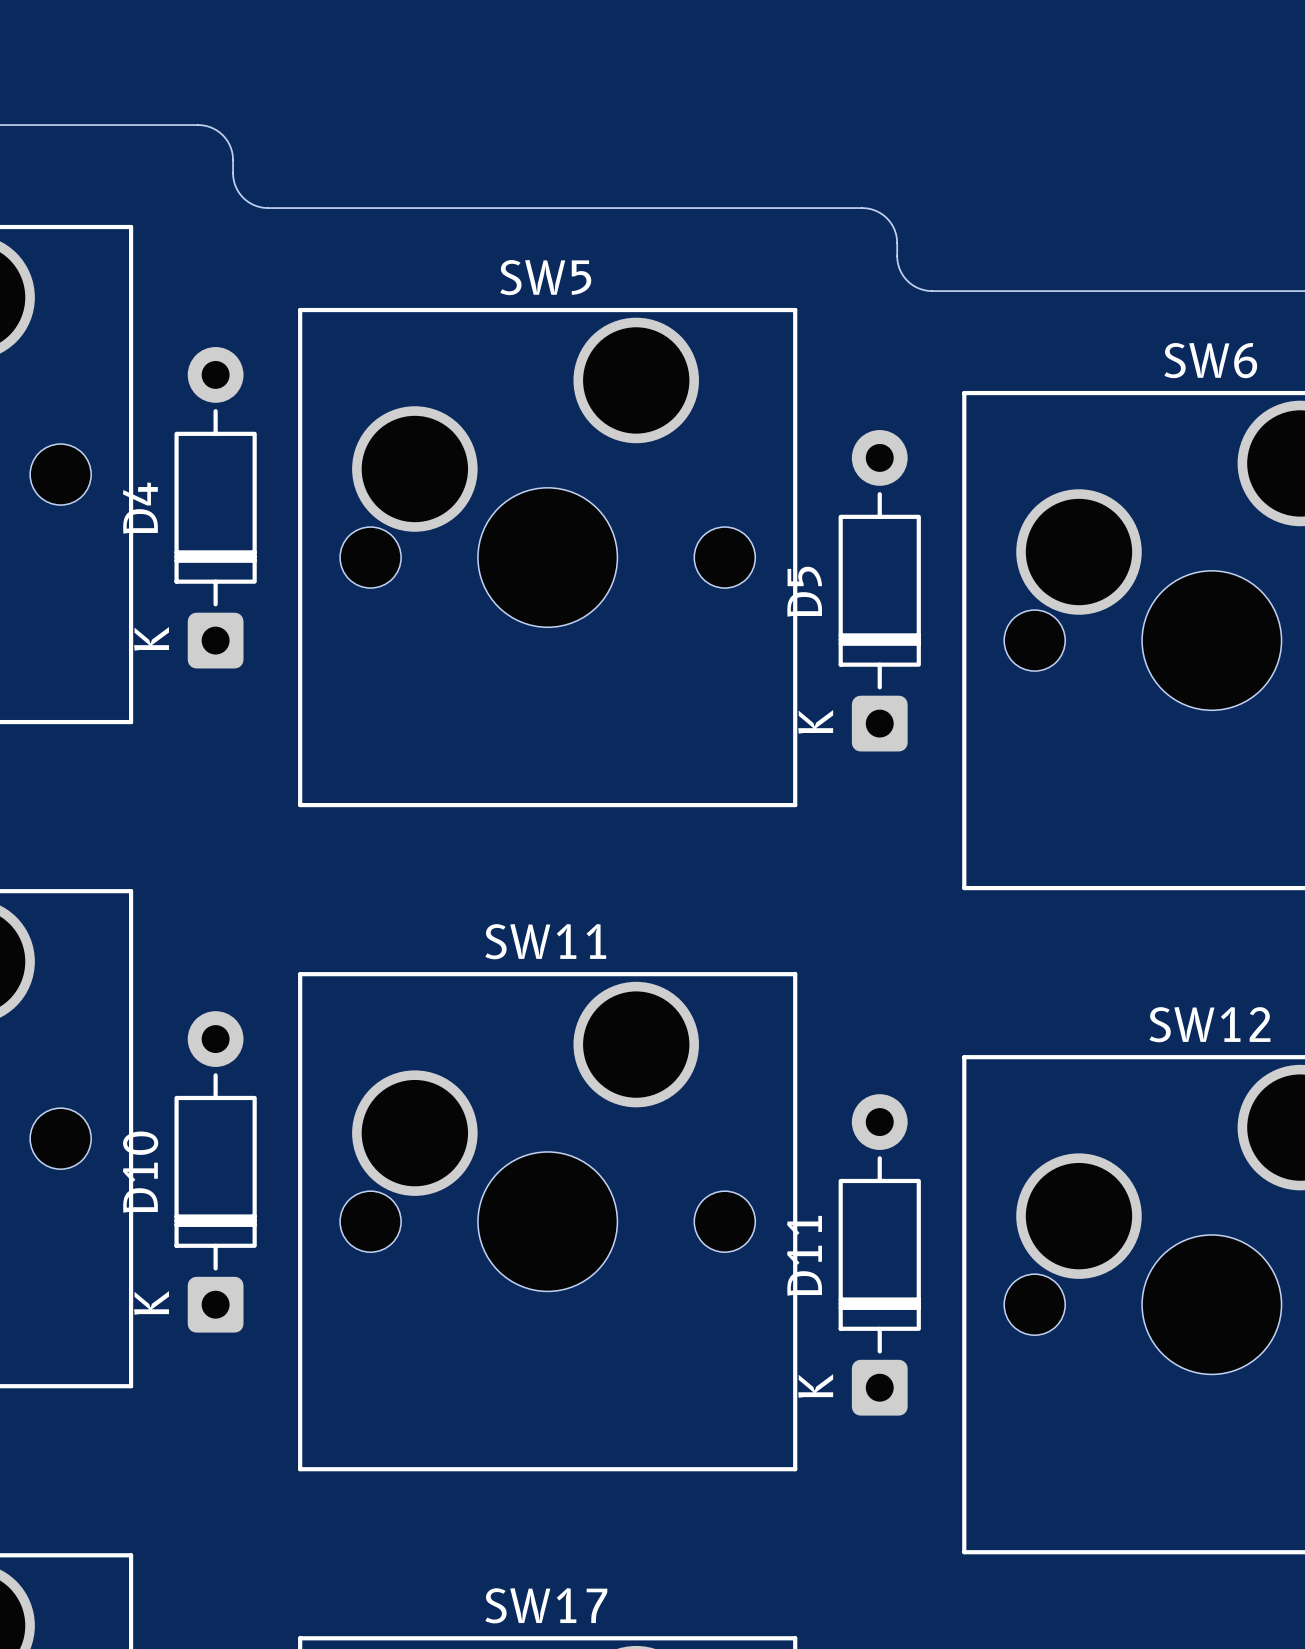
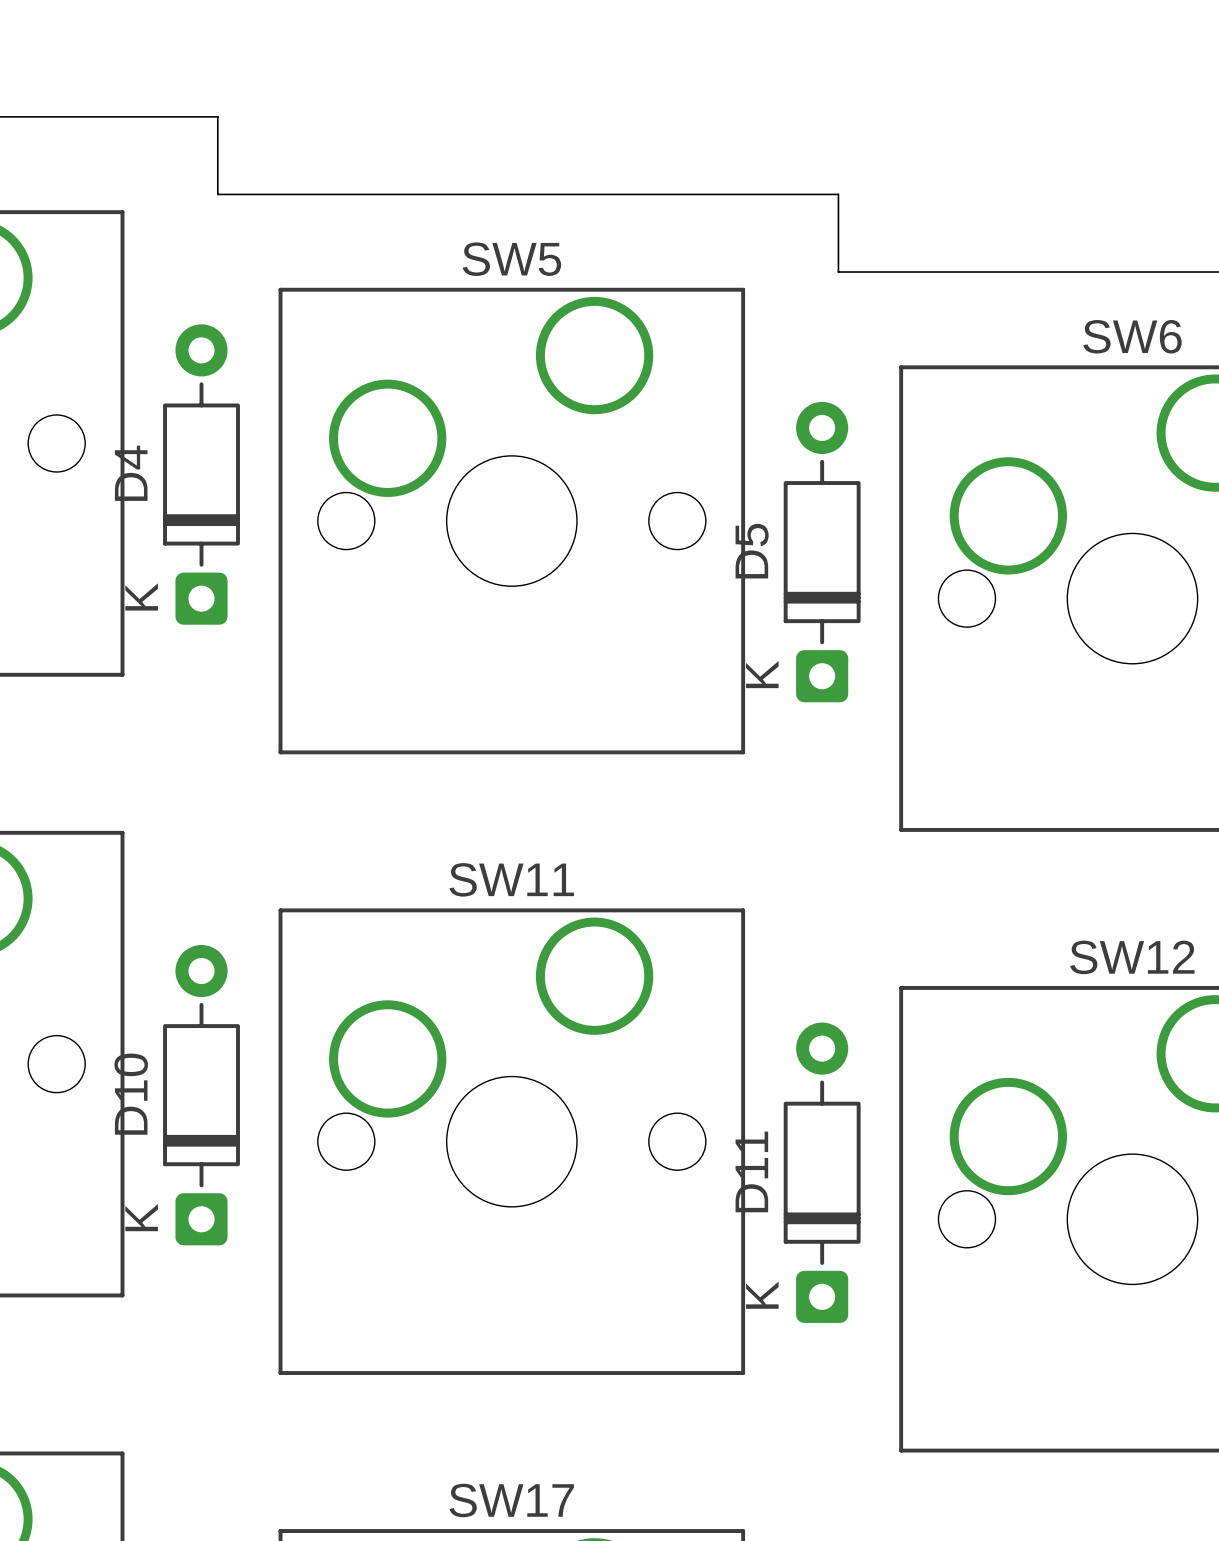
board edge: (198, 125) (209, 127) (222, 135) (229, 144) (233, 159) -> (185, 116) (217, 116) (217, 149)
board edge: (233, 173) (235, 184) (243, 197) (256, 206) (267, 208) -> (217, 161) (217, 194) (250, 194)
board edge: (862, 208) (875, 210) (886, 218) (894, 229) (897, 242) -> (805, 194) (838, 194) (838, 227)
board edge: (897, 256) (900, 271) (907, 280) (920, 289) (932, 291) -> (838, 239) (838, 272) (871, 272)

